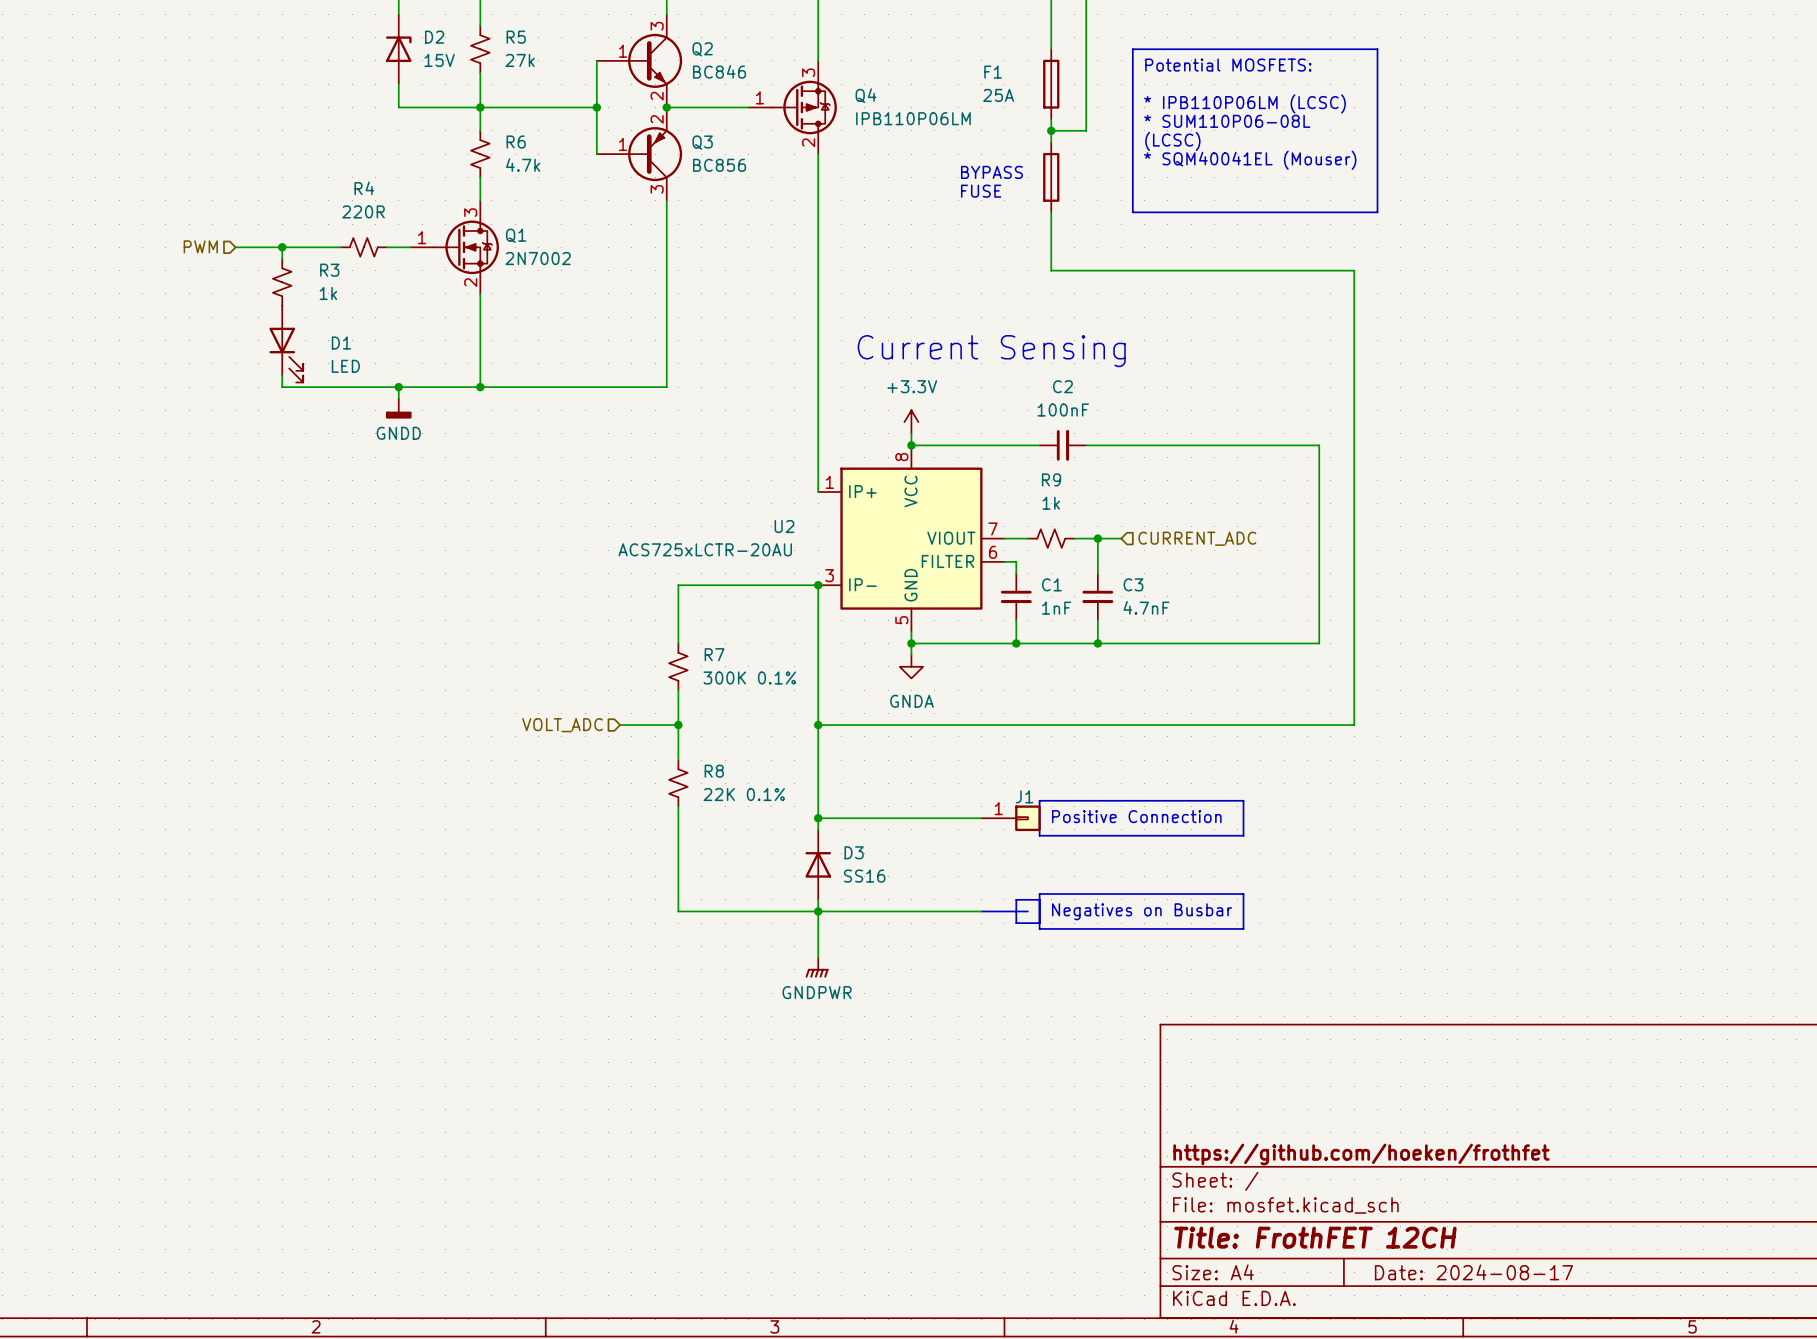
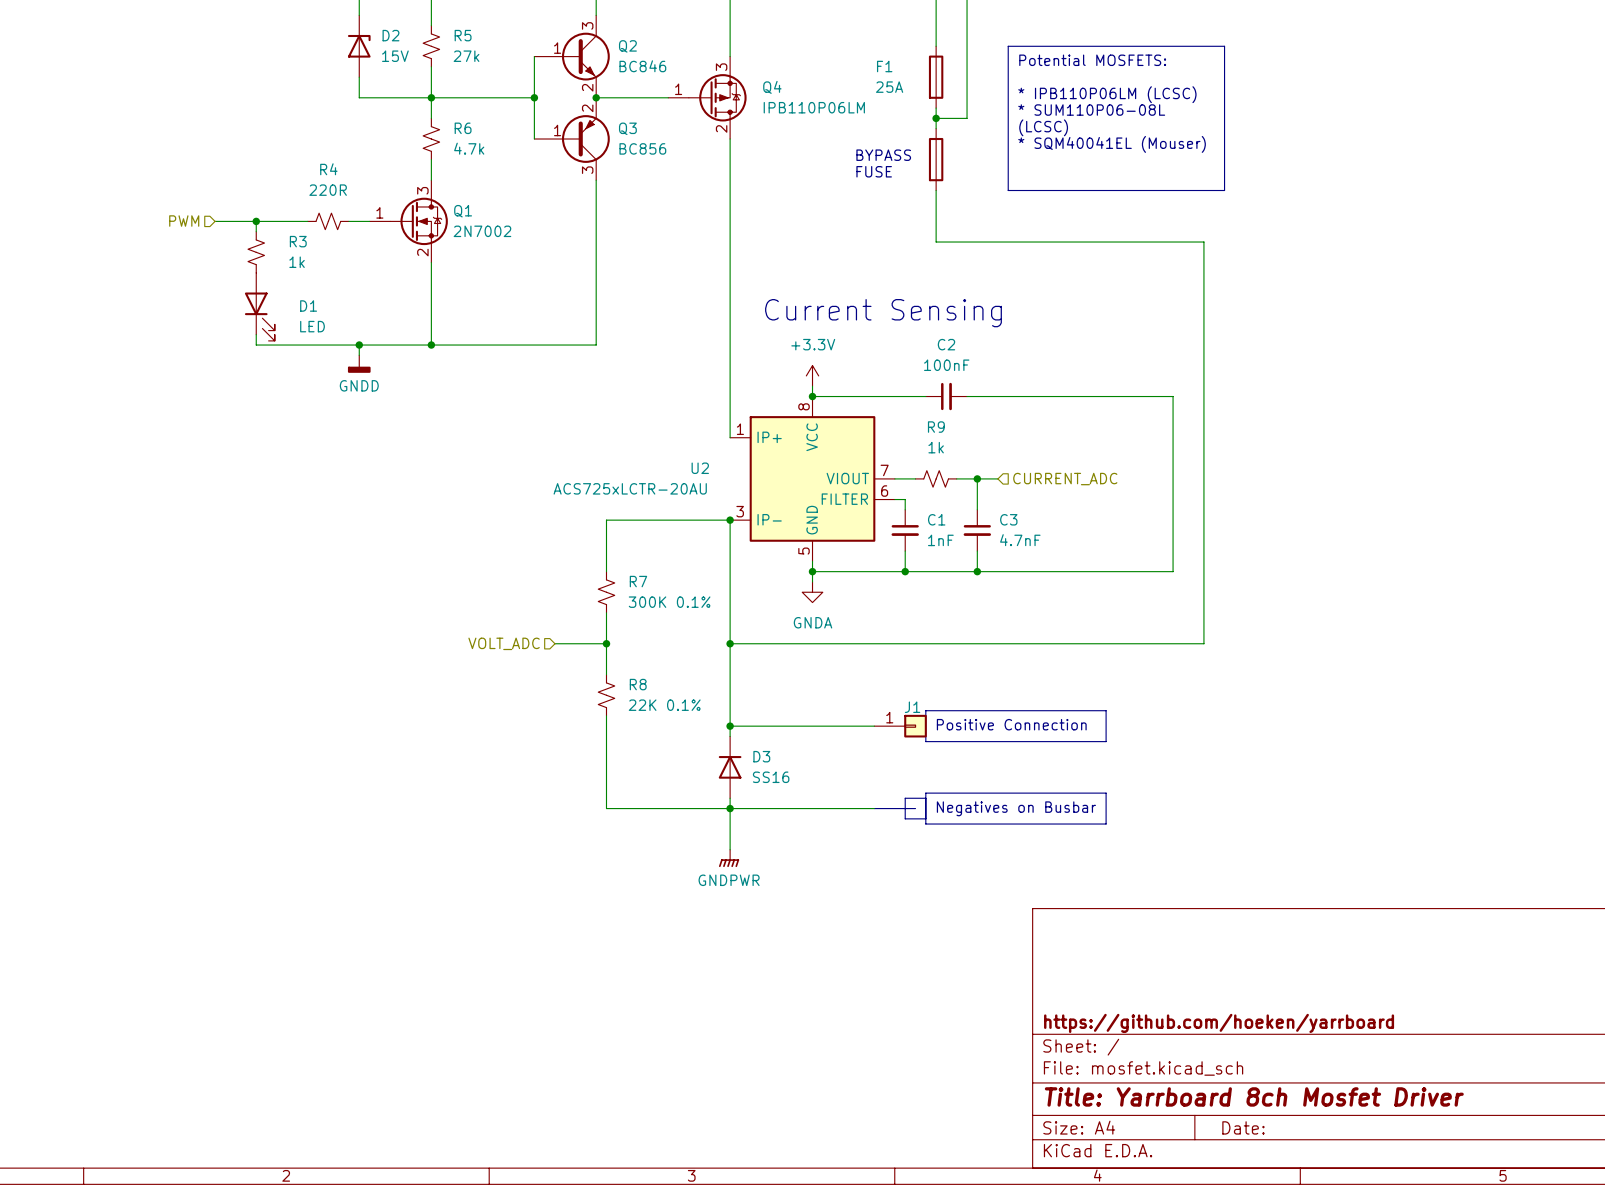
title block: https://github.com/hoeken/frothfet (1361, 1154) -> https://github.com/hoeken/yarrboard (1219, 1023)
title block: Title: FrothFET 12CH (1315, 1237) -> Title: Yarrboard 8ch Mosfet Driver (1254, 1096)
title block: Date: 2024-08-17 (1473, 1272) -> Date: (1243, 1127)

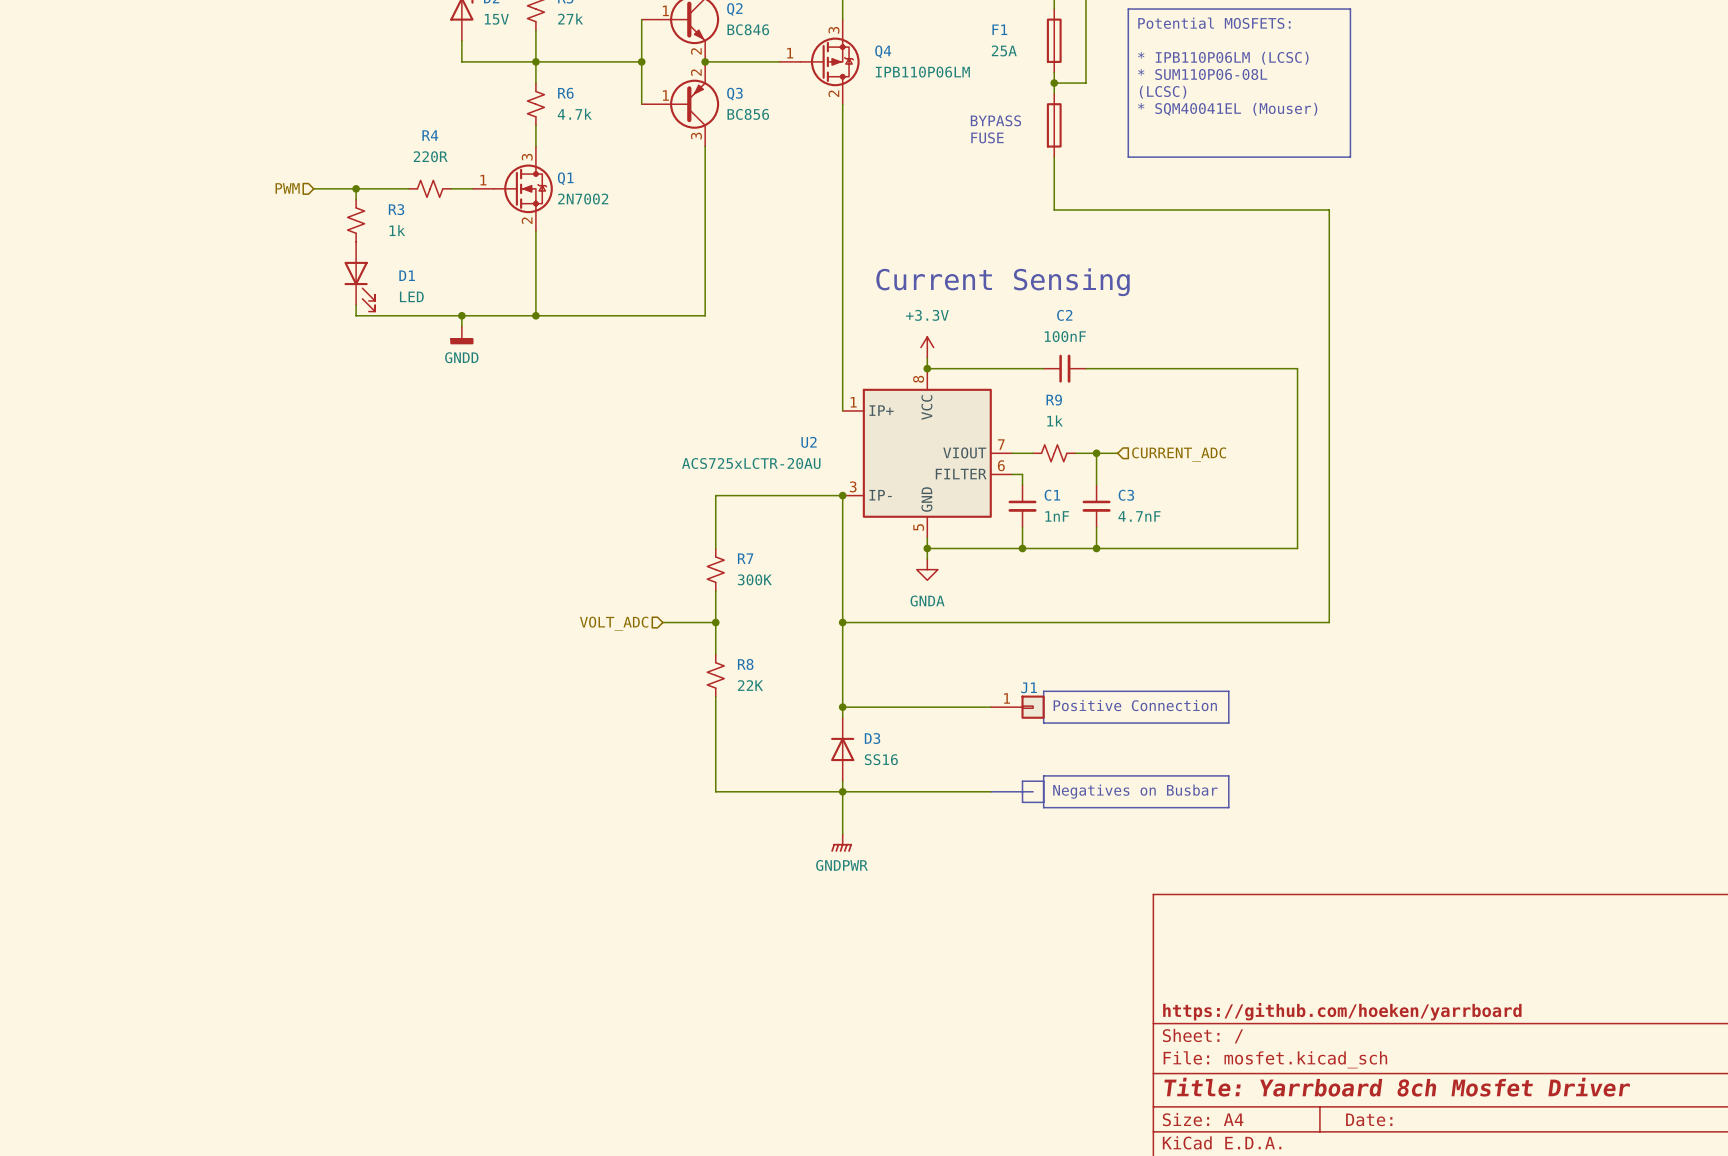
R7 value: 300K 0.1% (669, 602) -> 300K (754, 579)
R8 value: 22K 0.1% (664, 705) -> 22K (750, 685)

